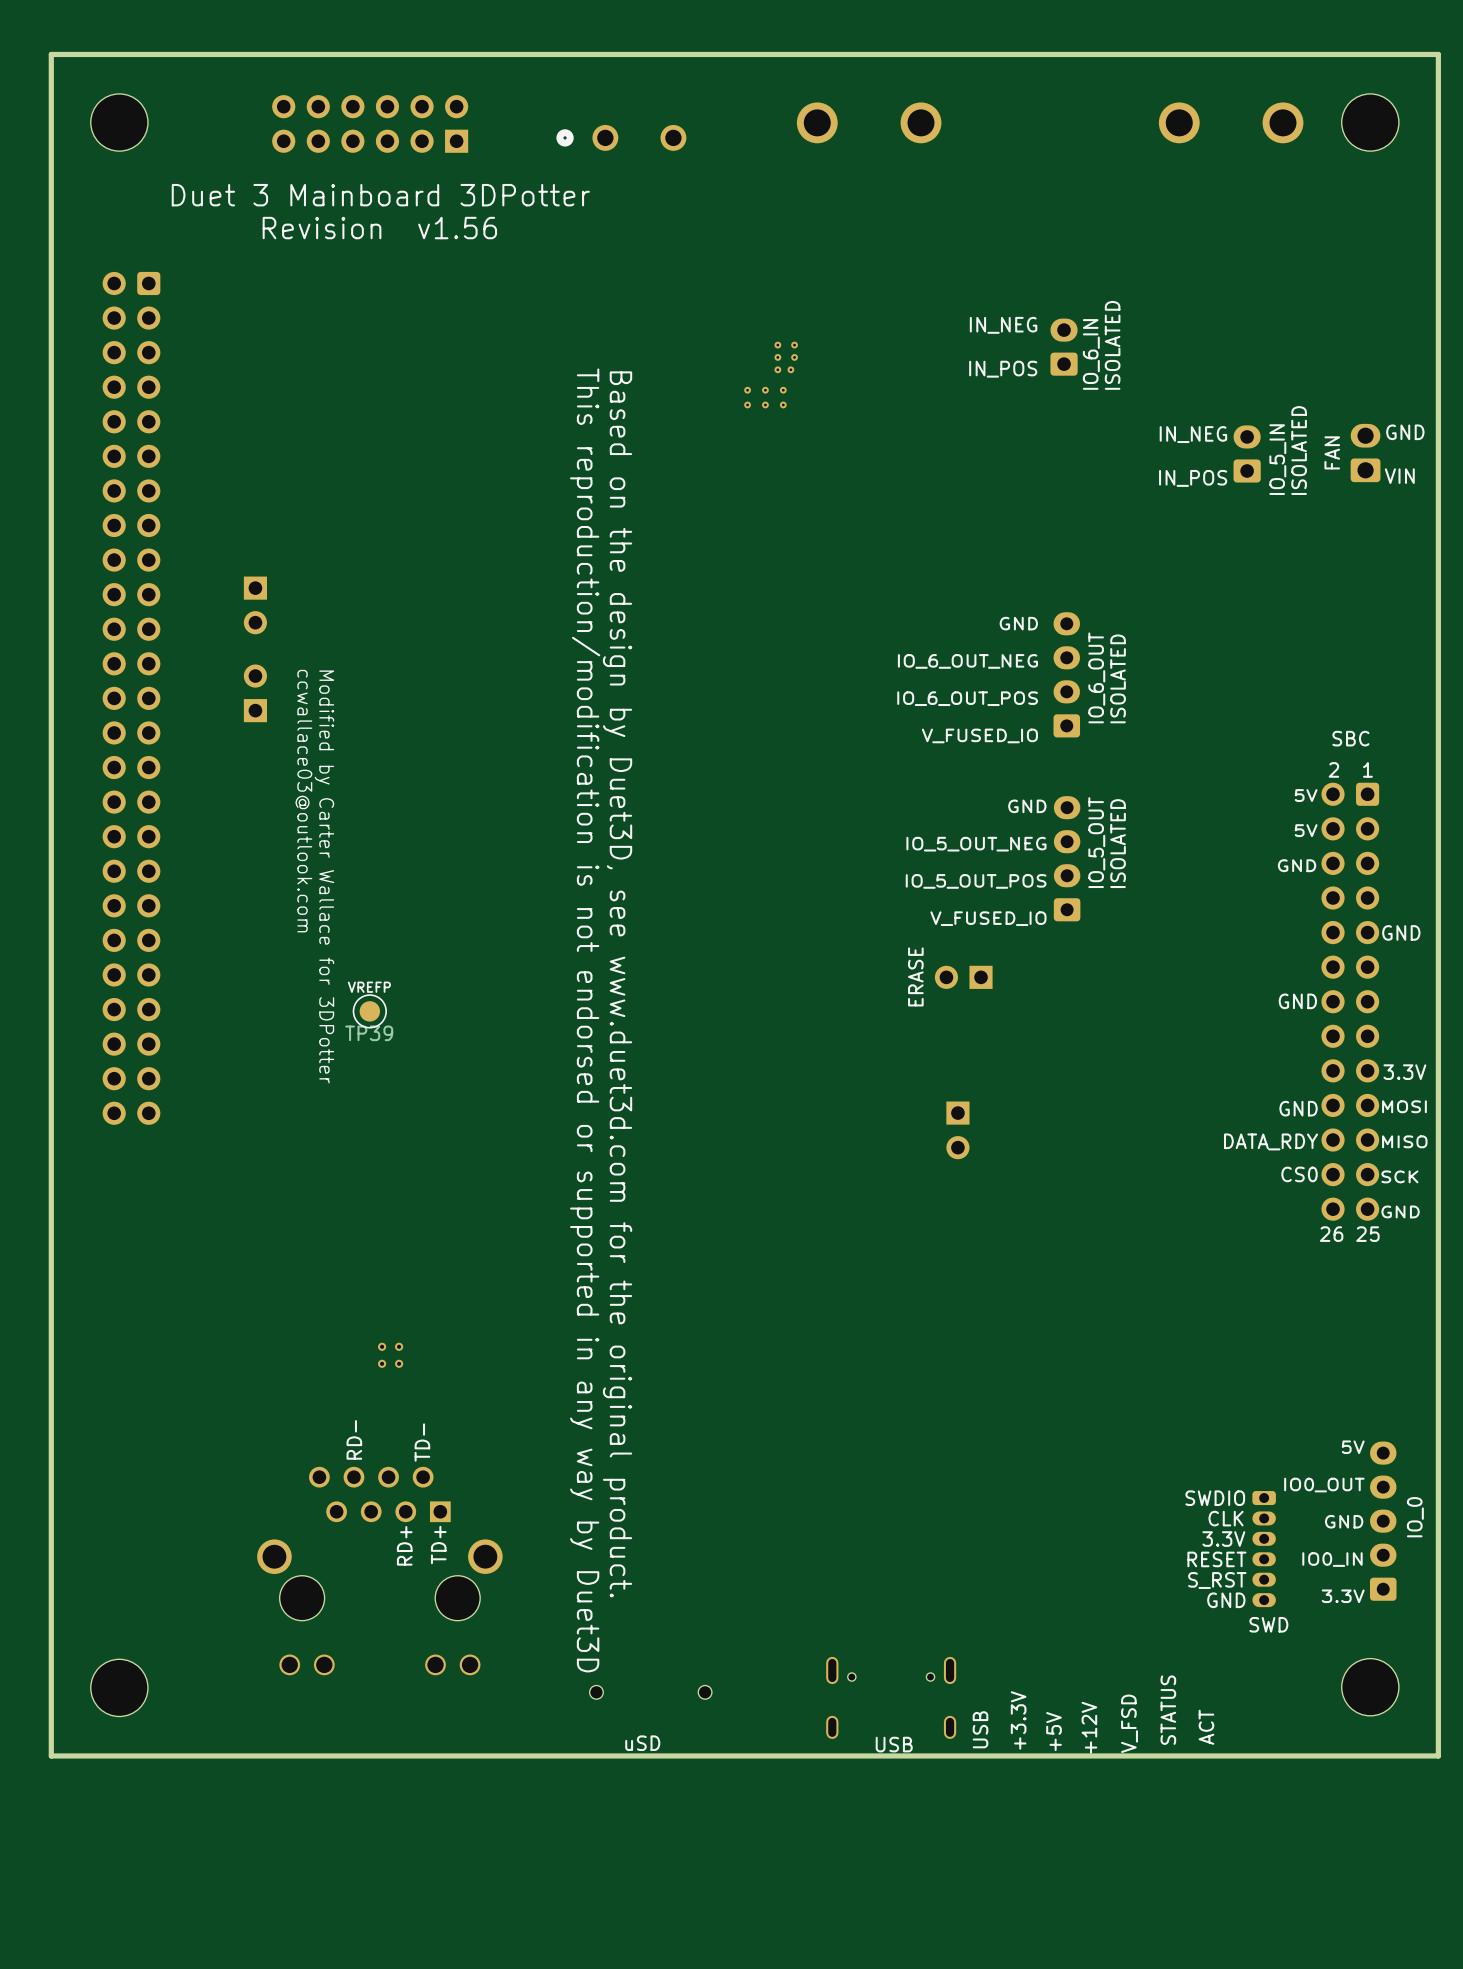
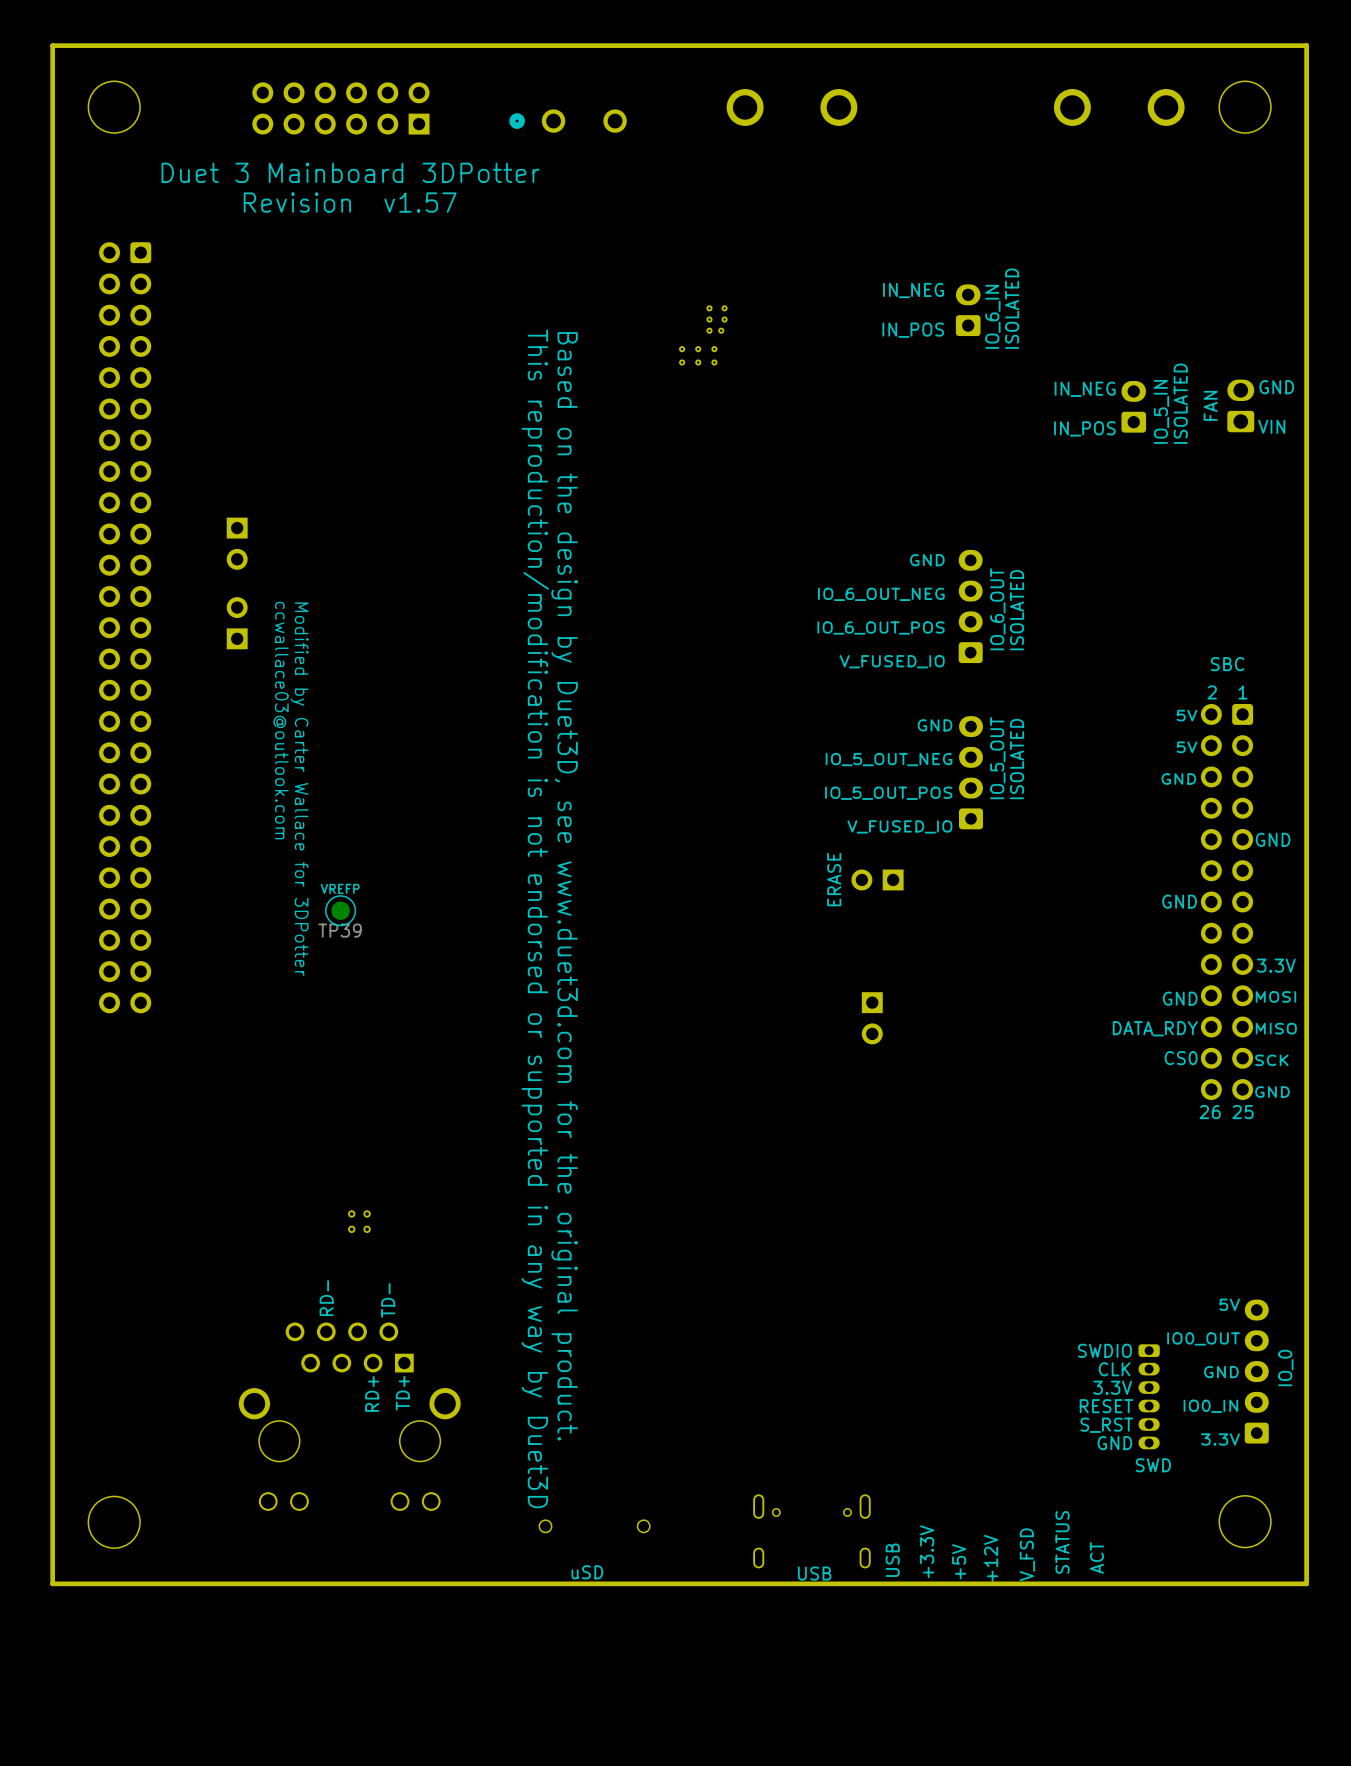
text: Revision v1.56 (379, 228) -> Revision v1.57 (350, 202)

